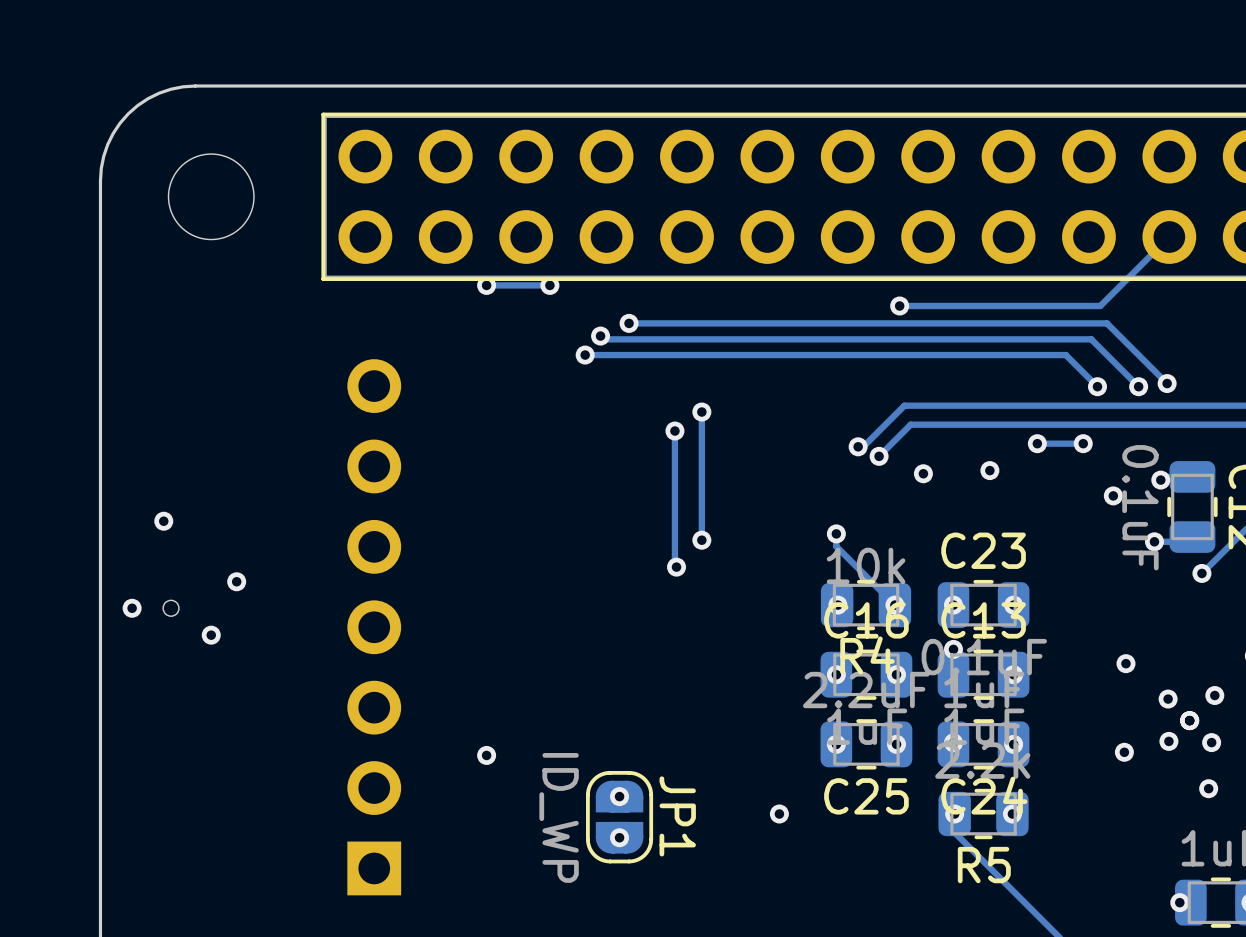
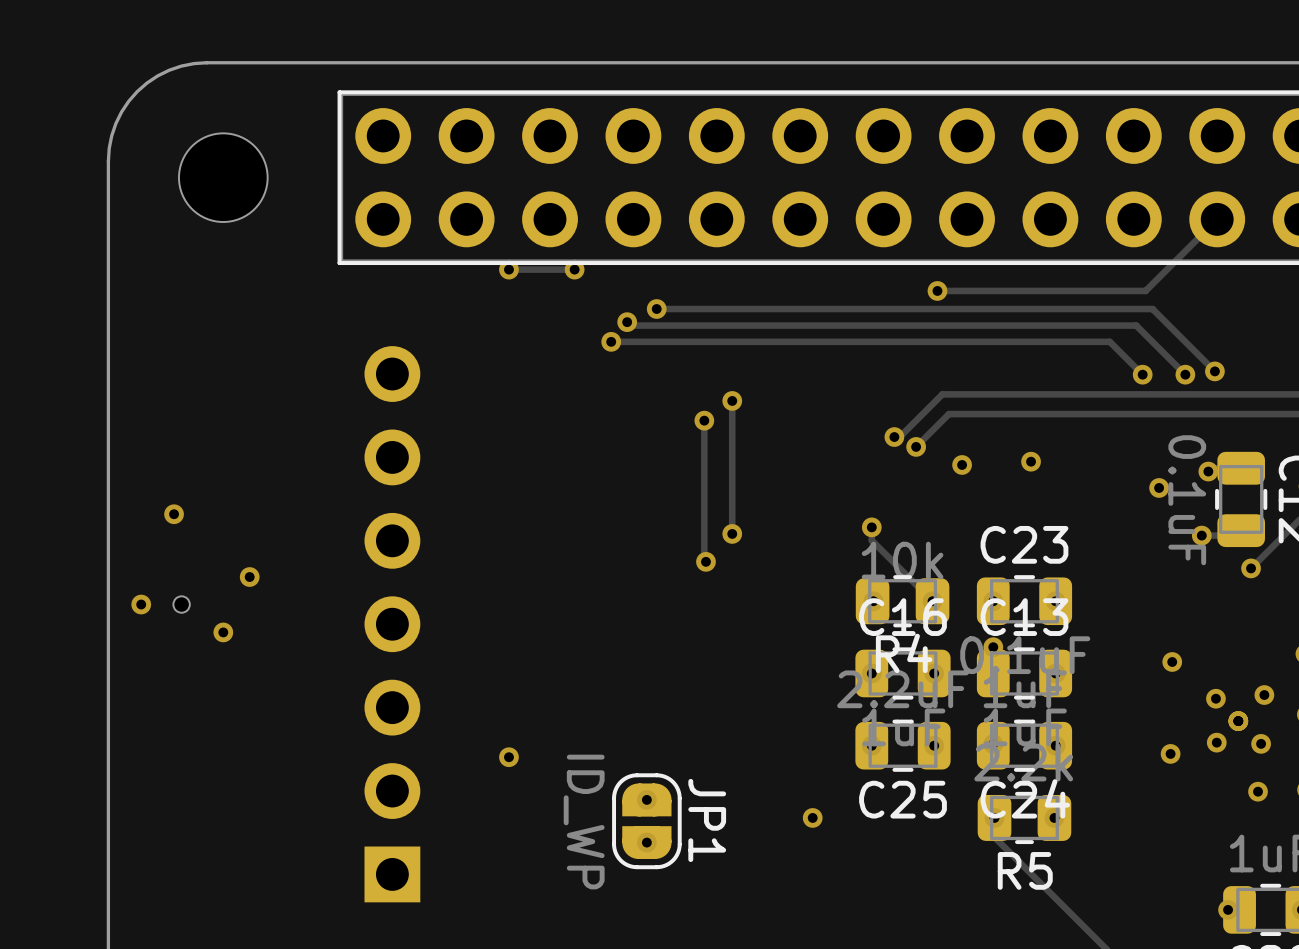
via: (1037, 443) -> none
track: (1083, 443) (1037, 443) -> none
via: (1083, 443) -> none

